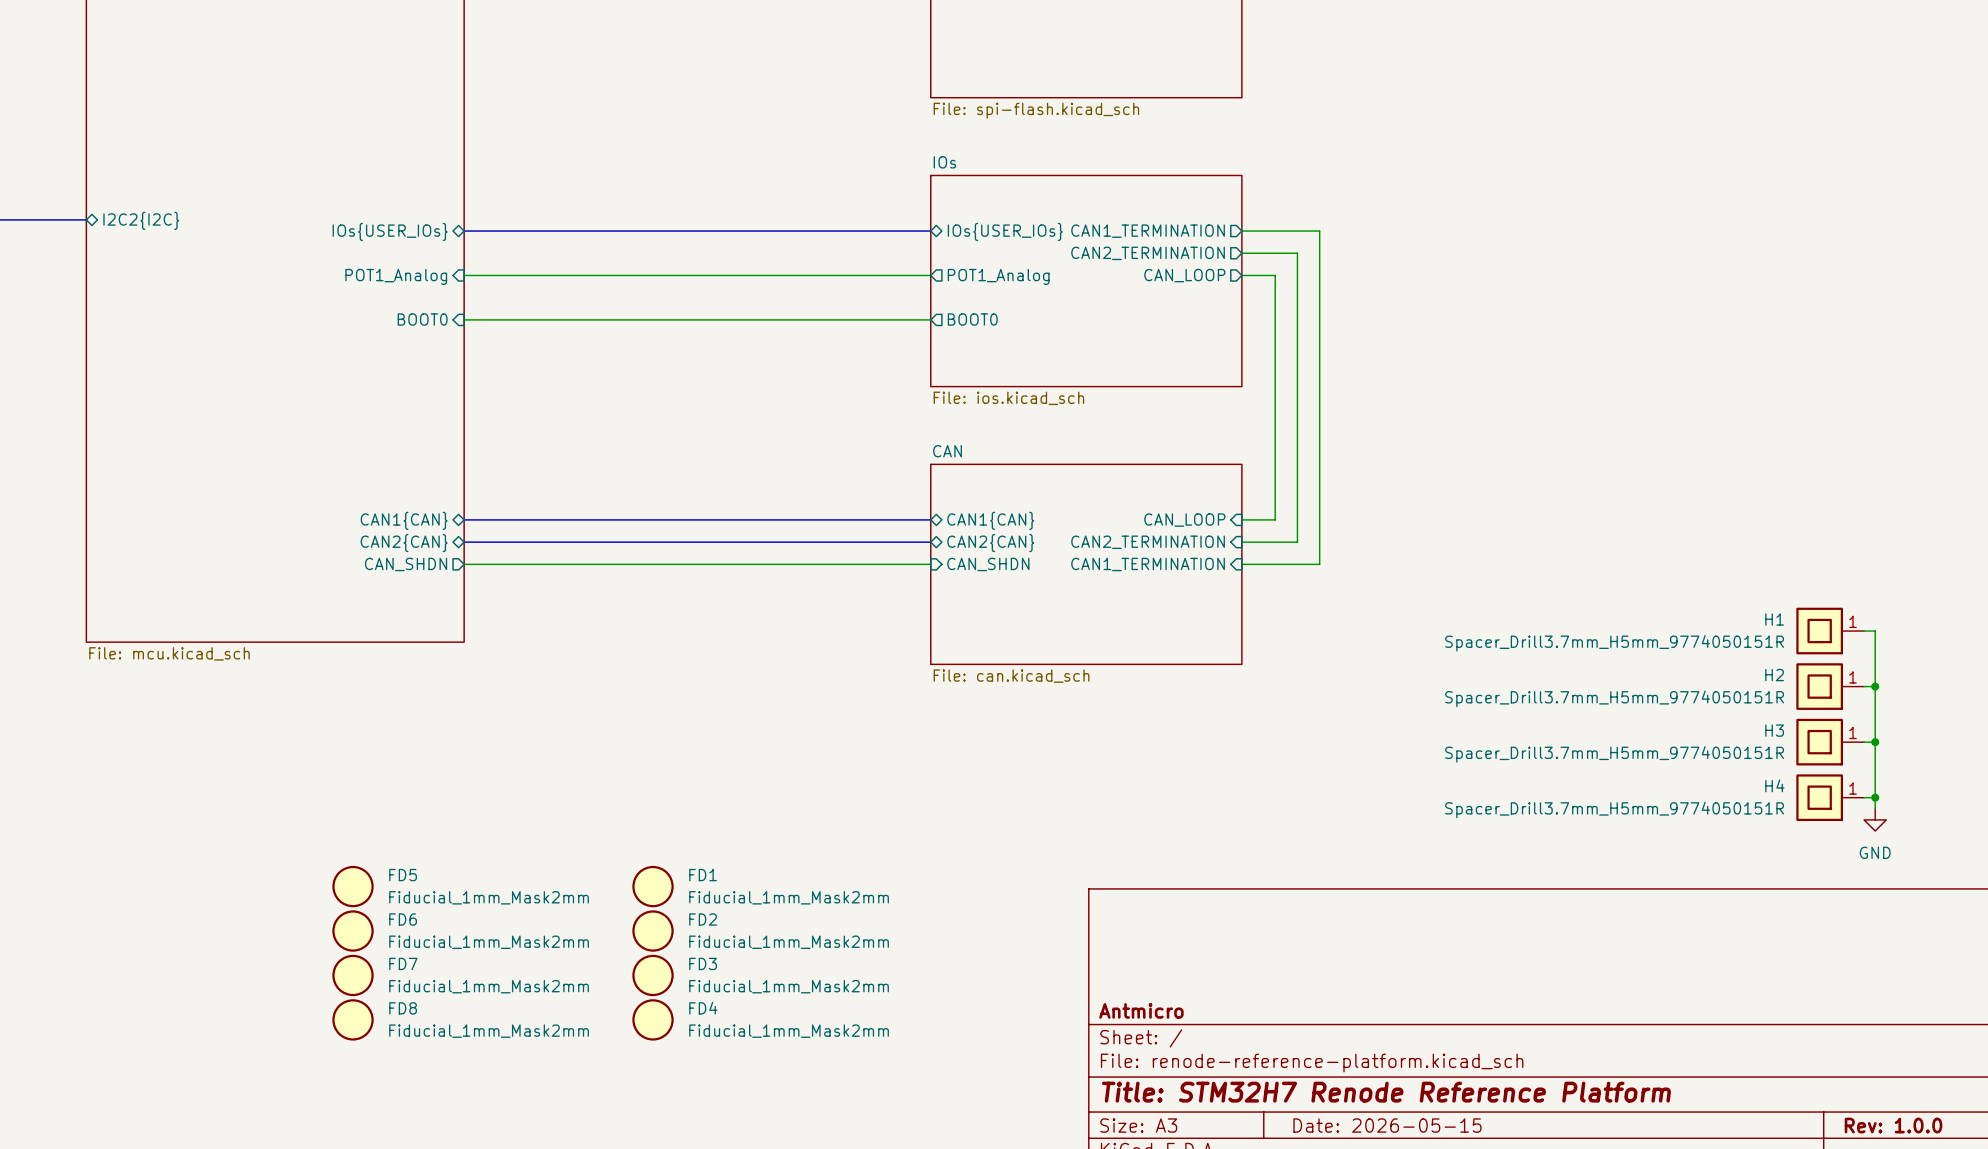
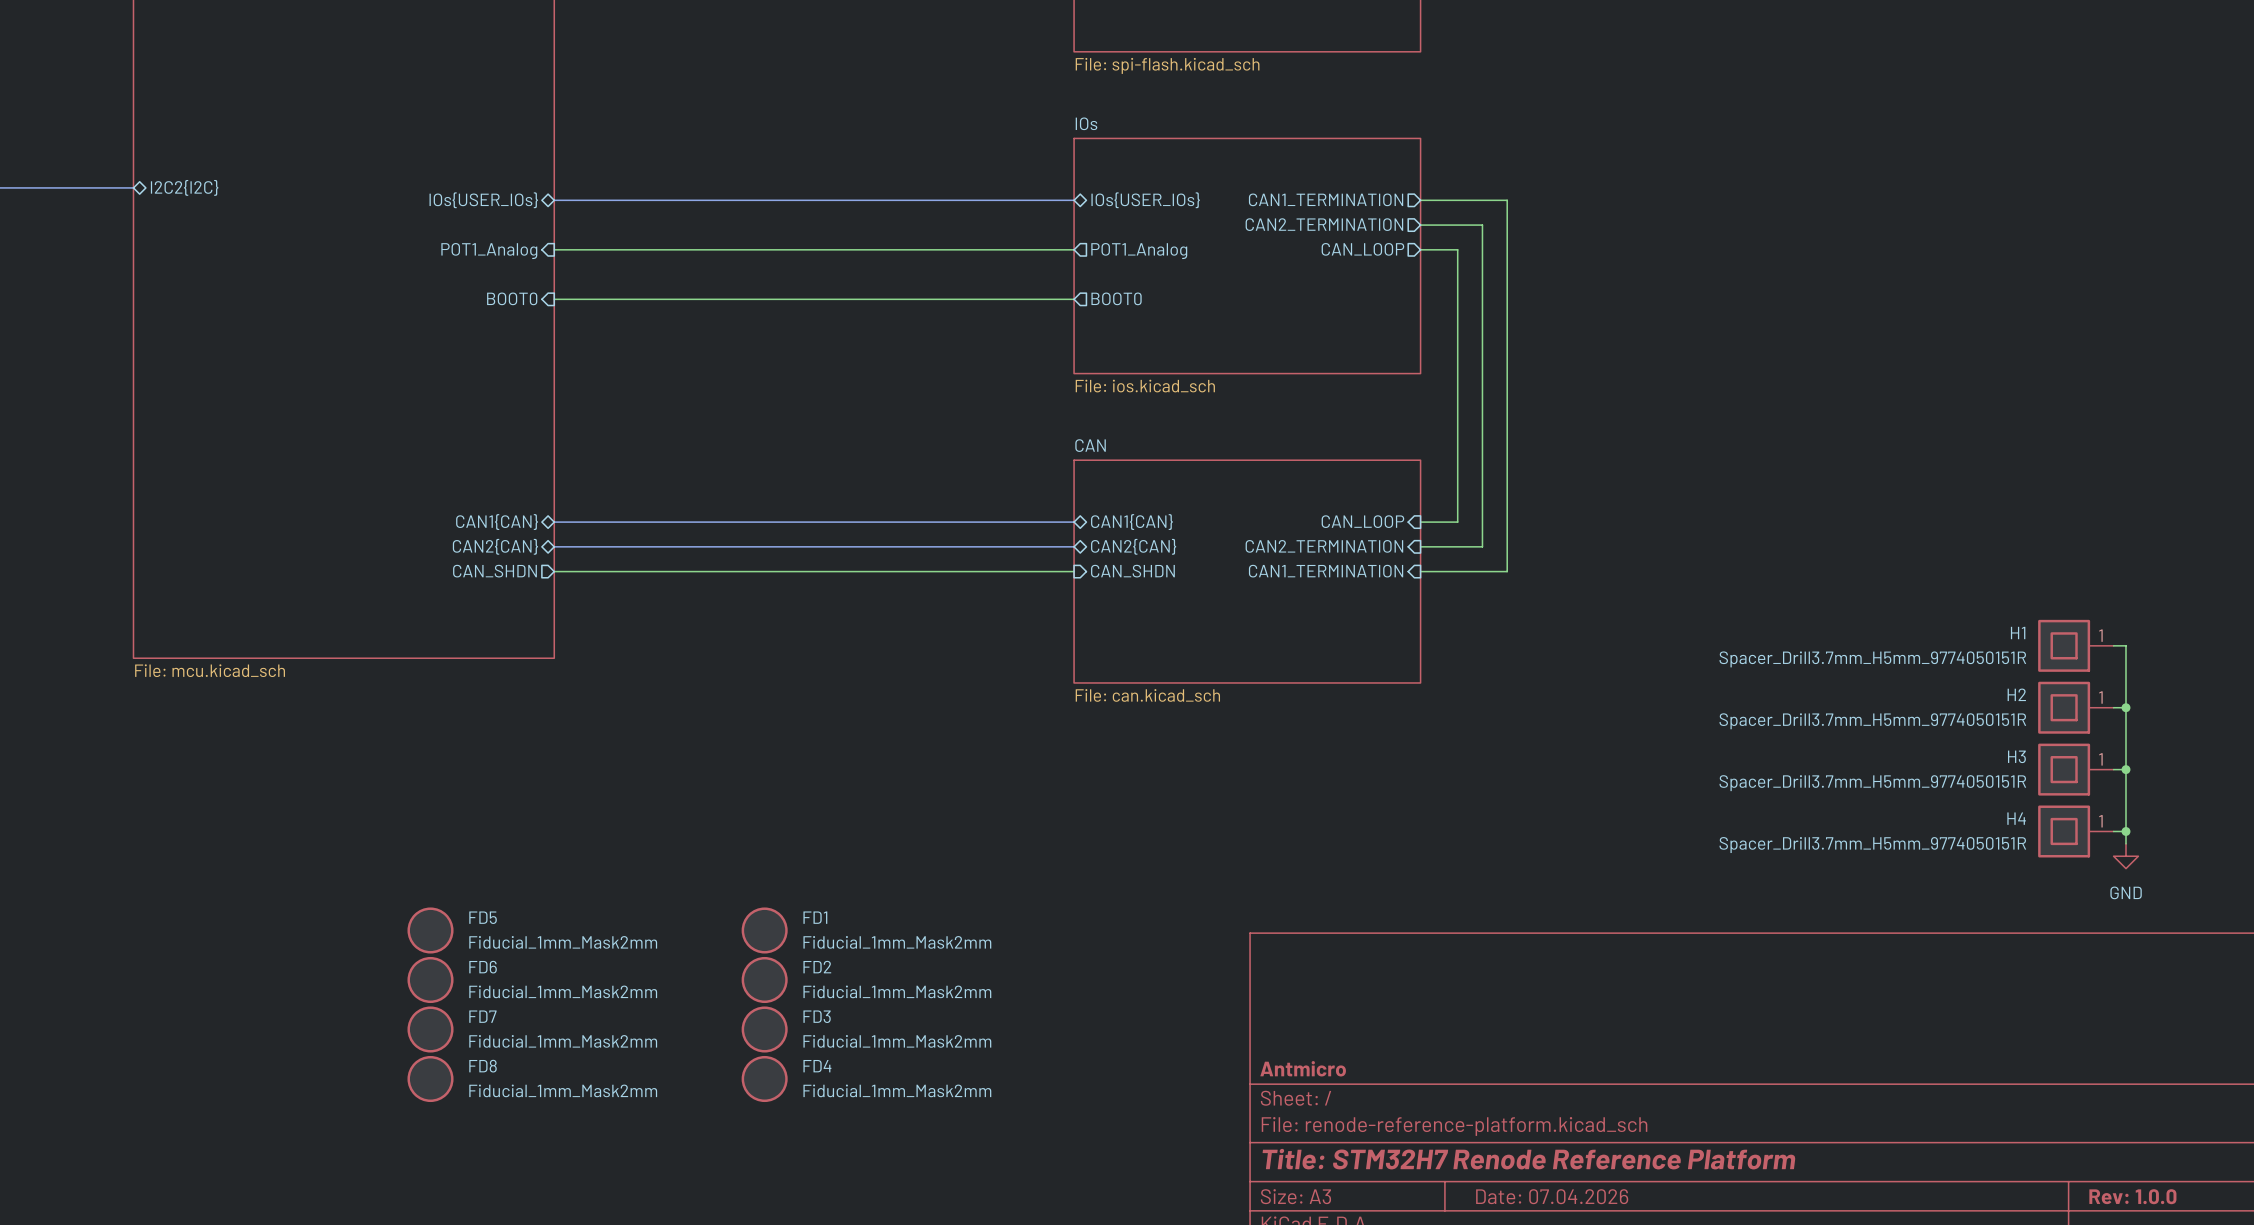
title block: Date: 2026-05-15 (1387, 1125) -> Date: 07.04.2026 (1552, 1196)

